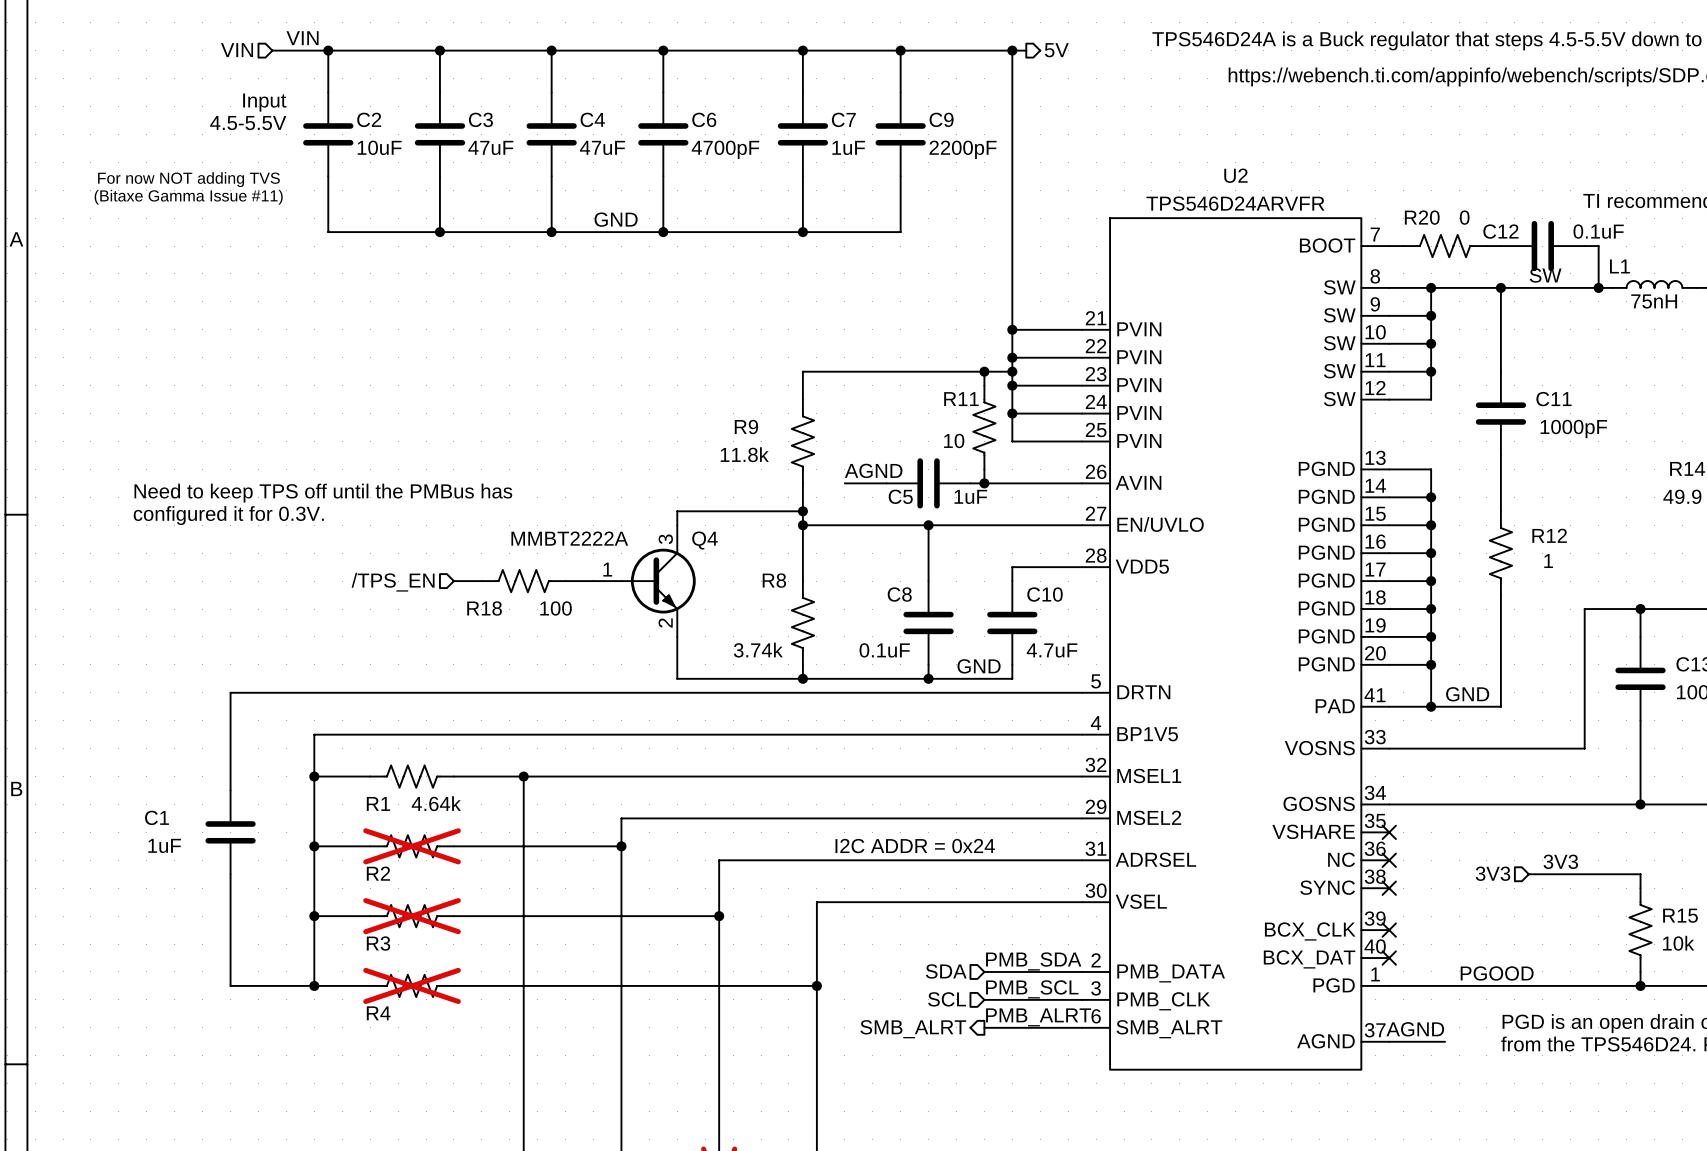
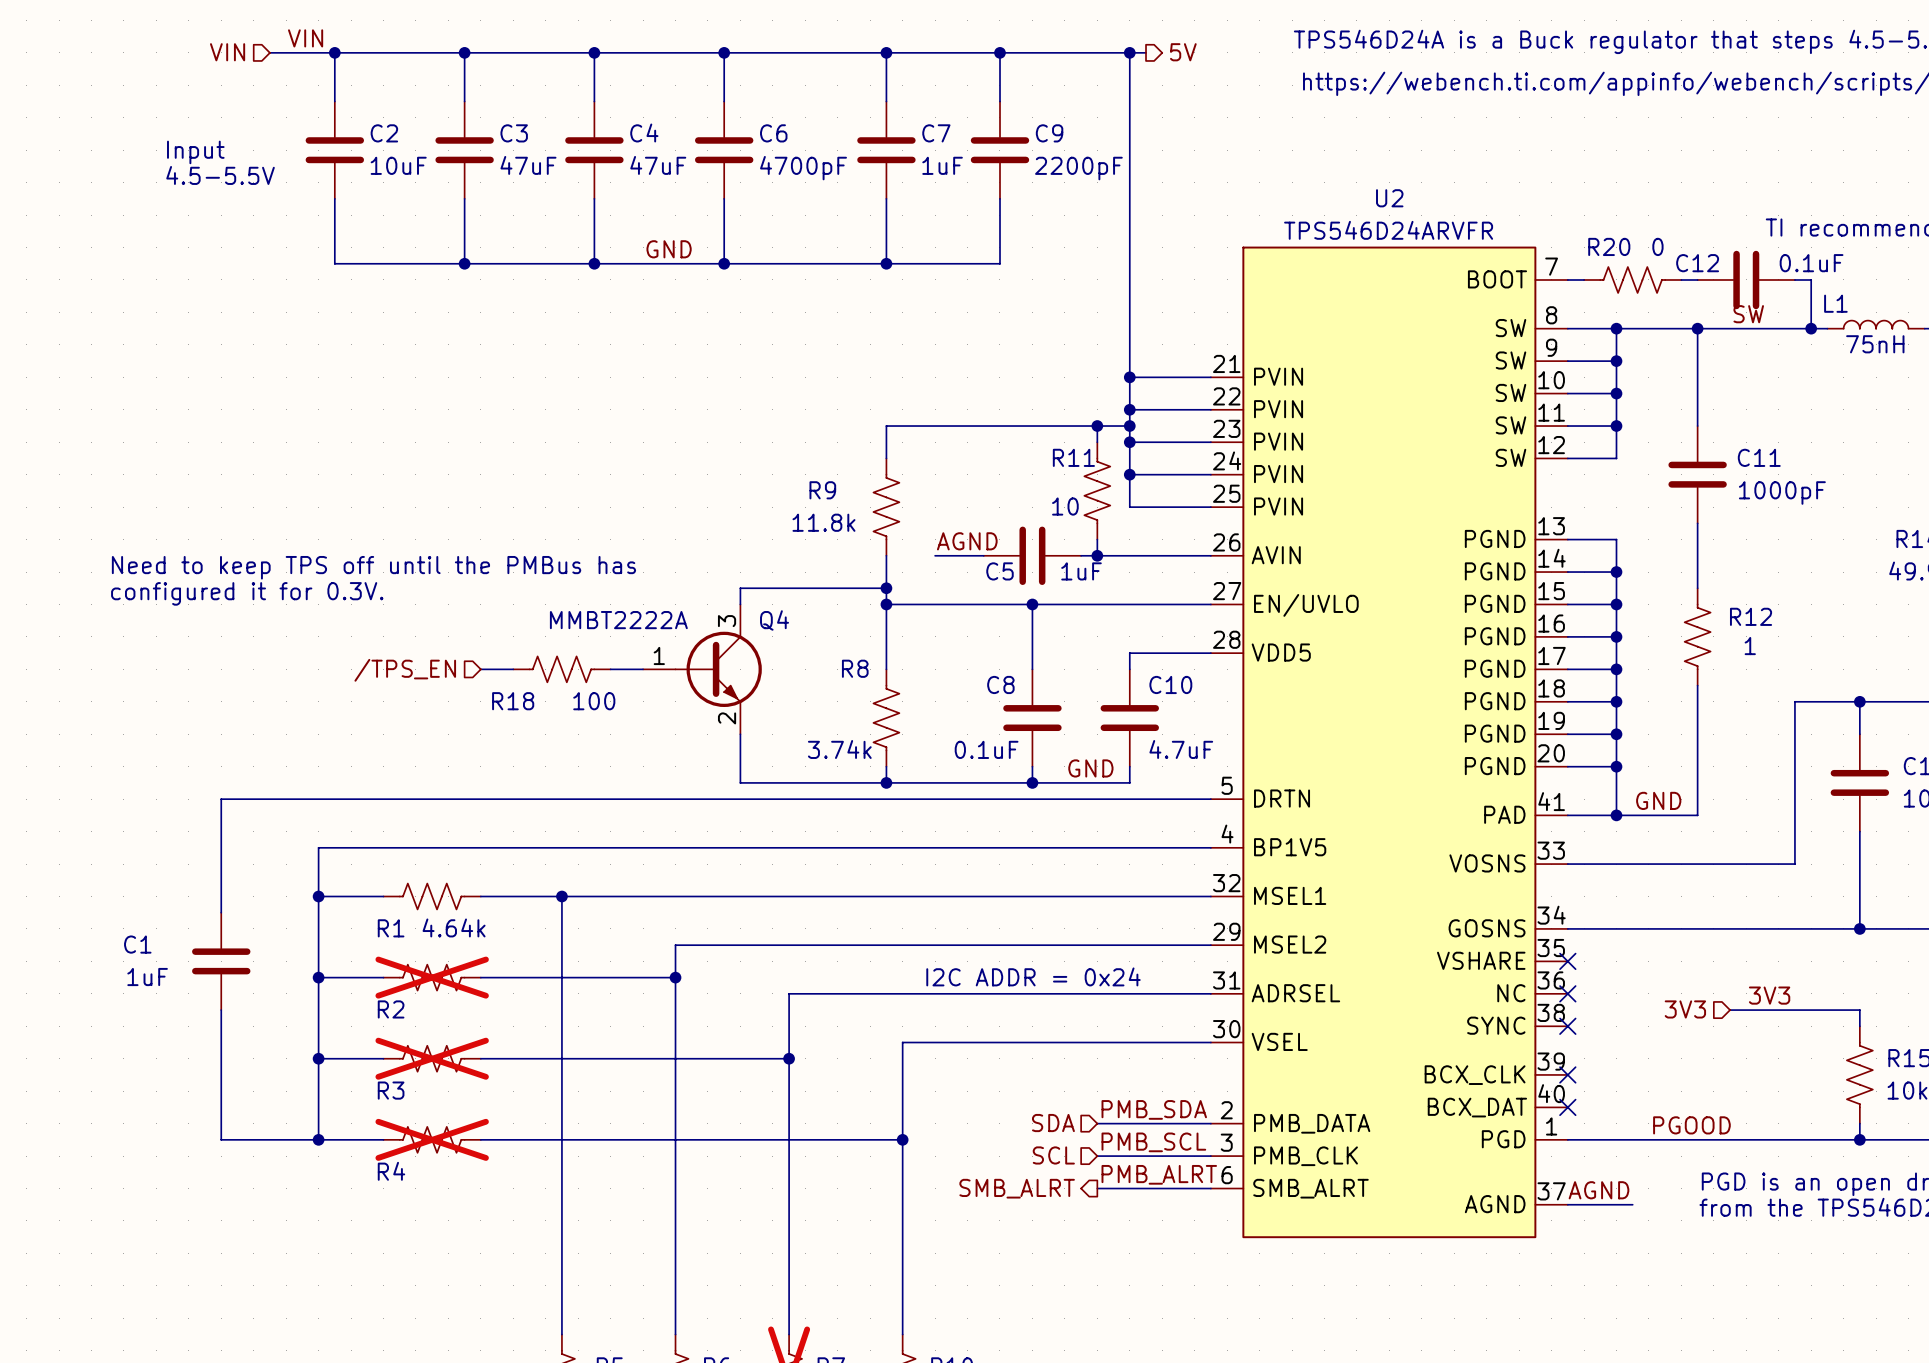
text position: Input (264, 102) -> Input (195, 152)
text position: 4.5-5.5V (248, 123) -> 4.5-5.5V (220, 175)
text: For now NOT adding TVS (188, 179) -> none
text: (Bitaxe Gamma Issue #11) (188, 197) -> none

